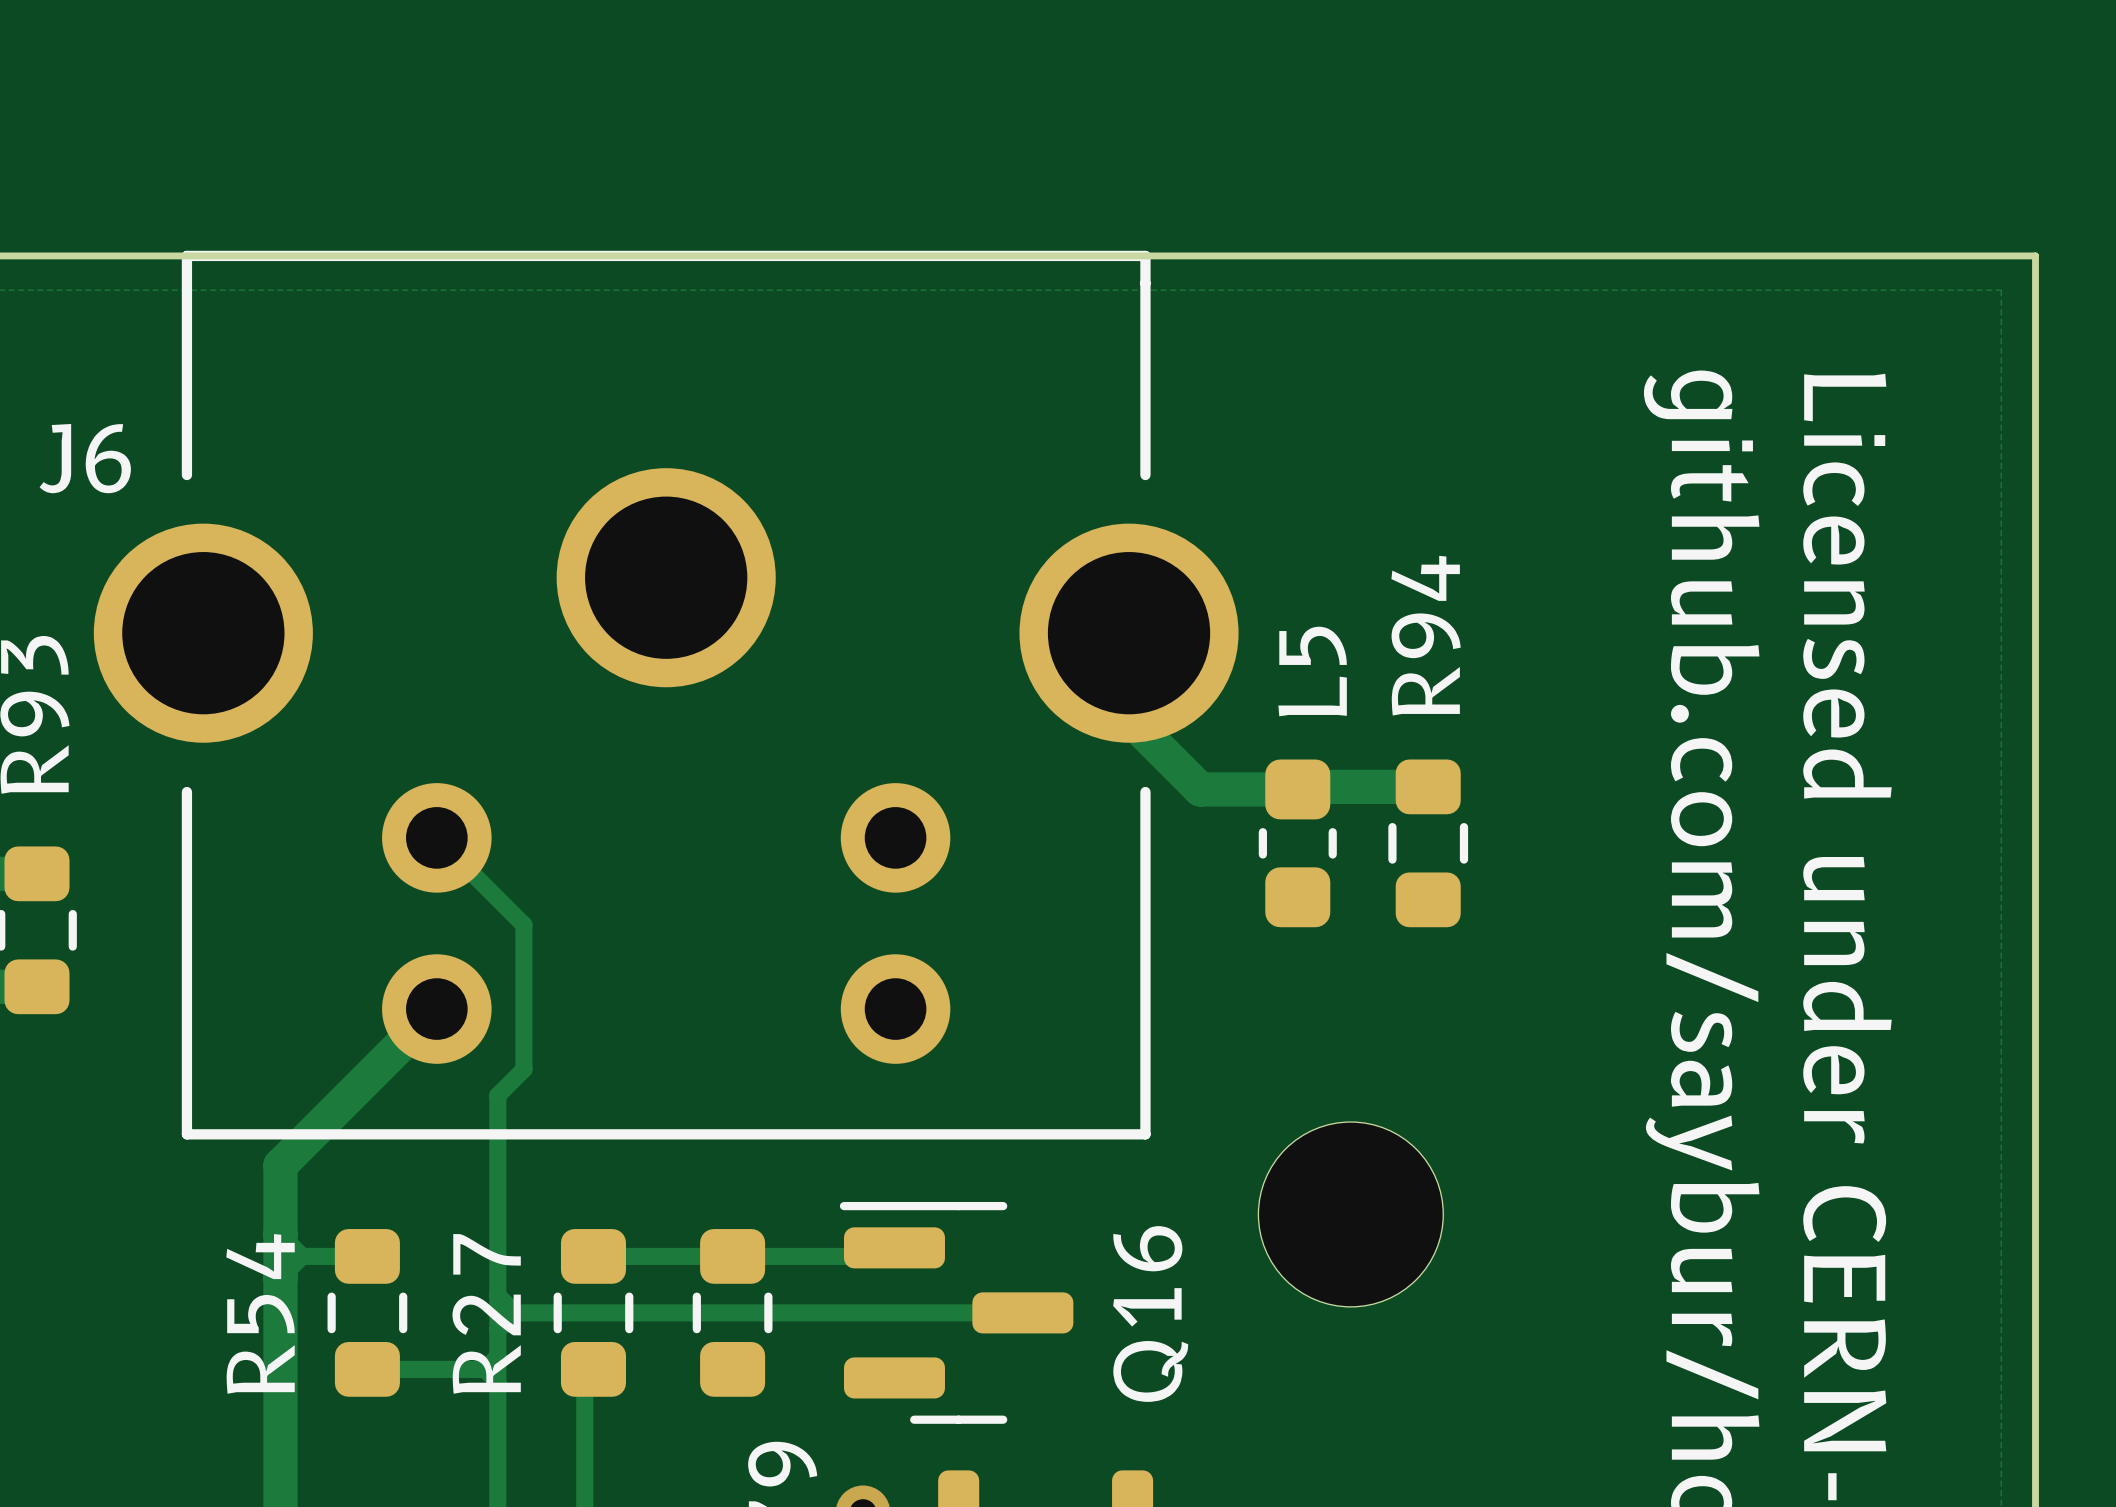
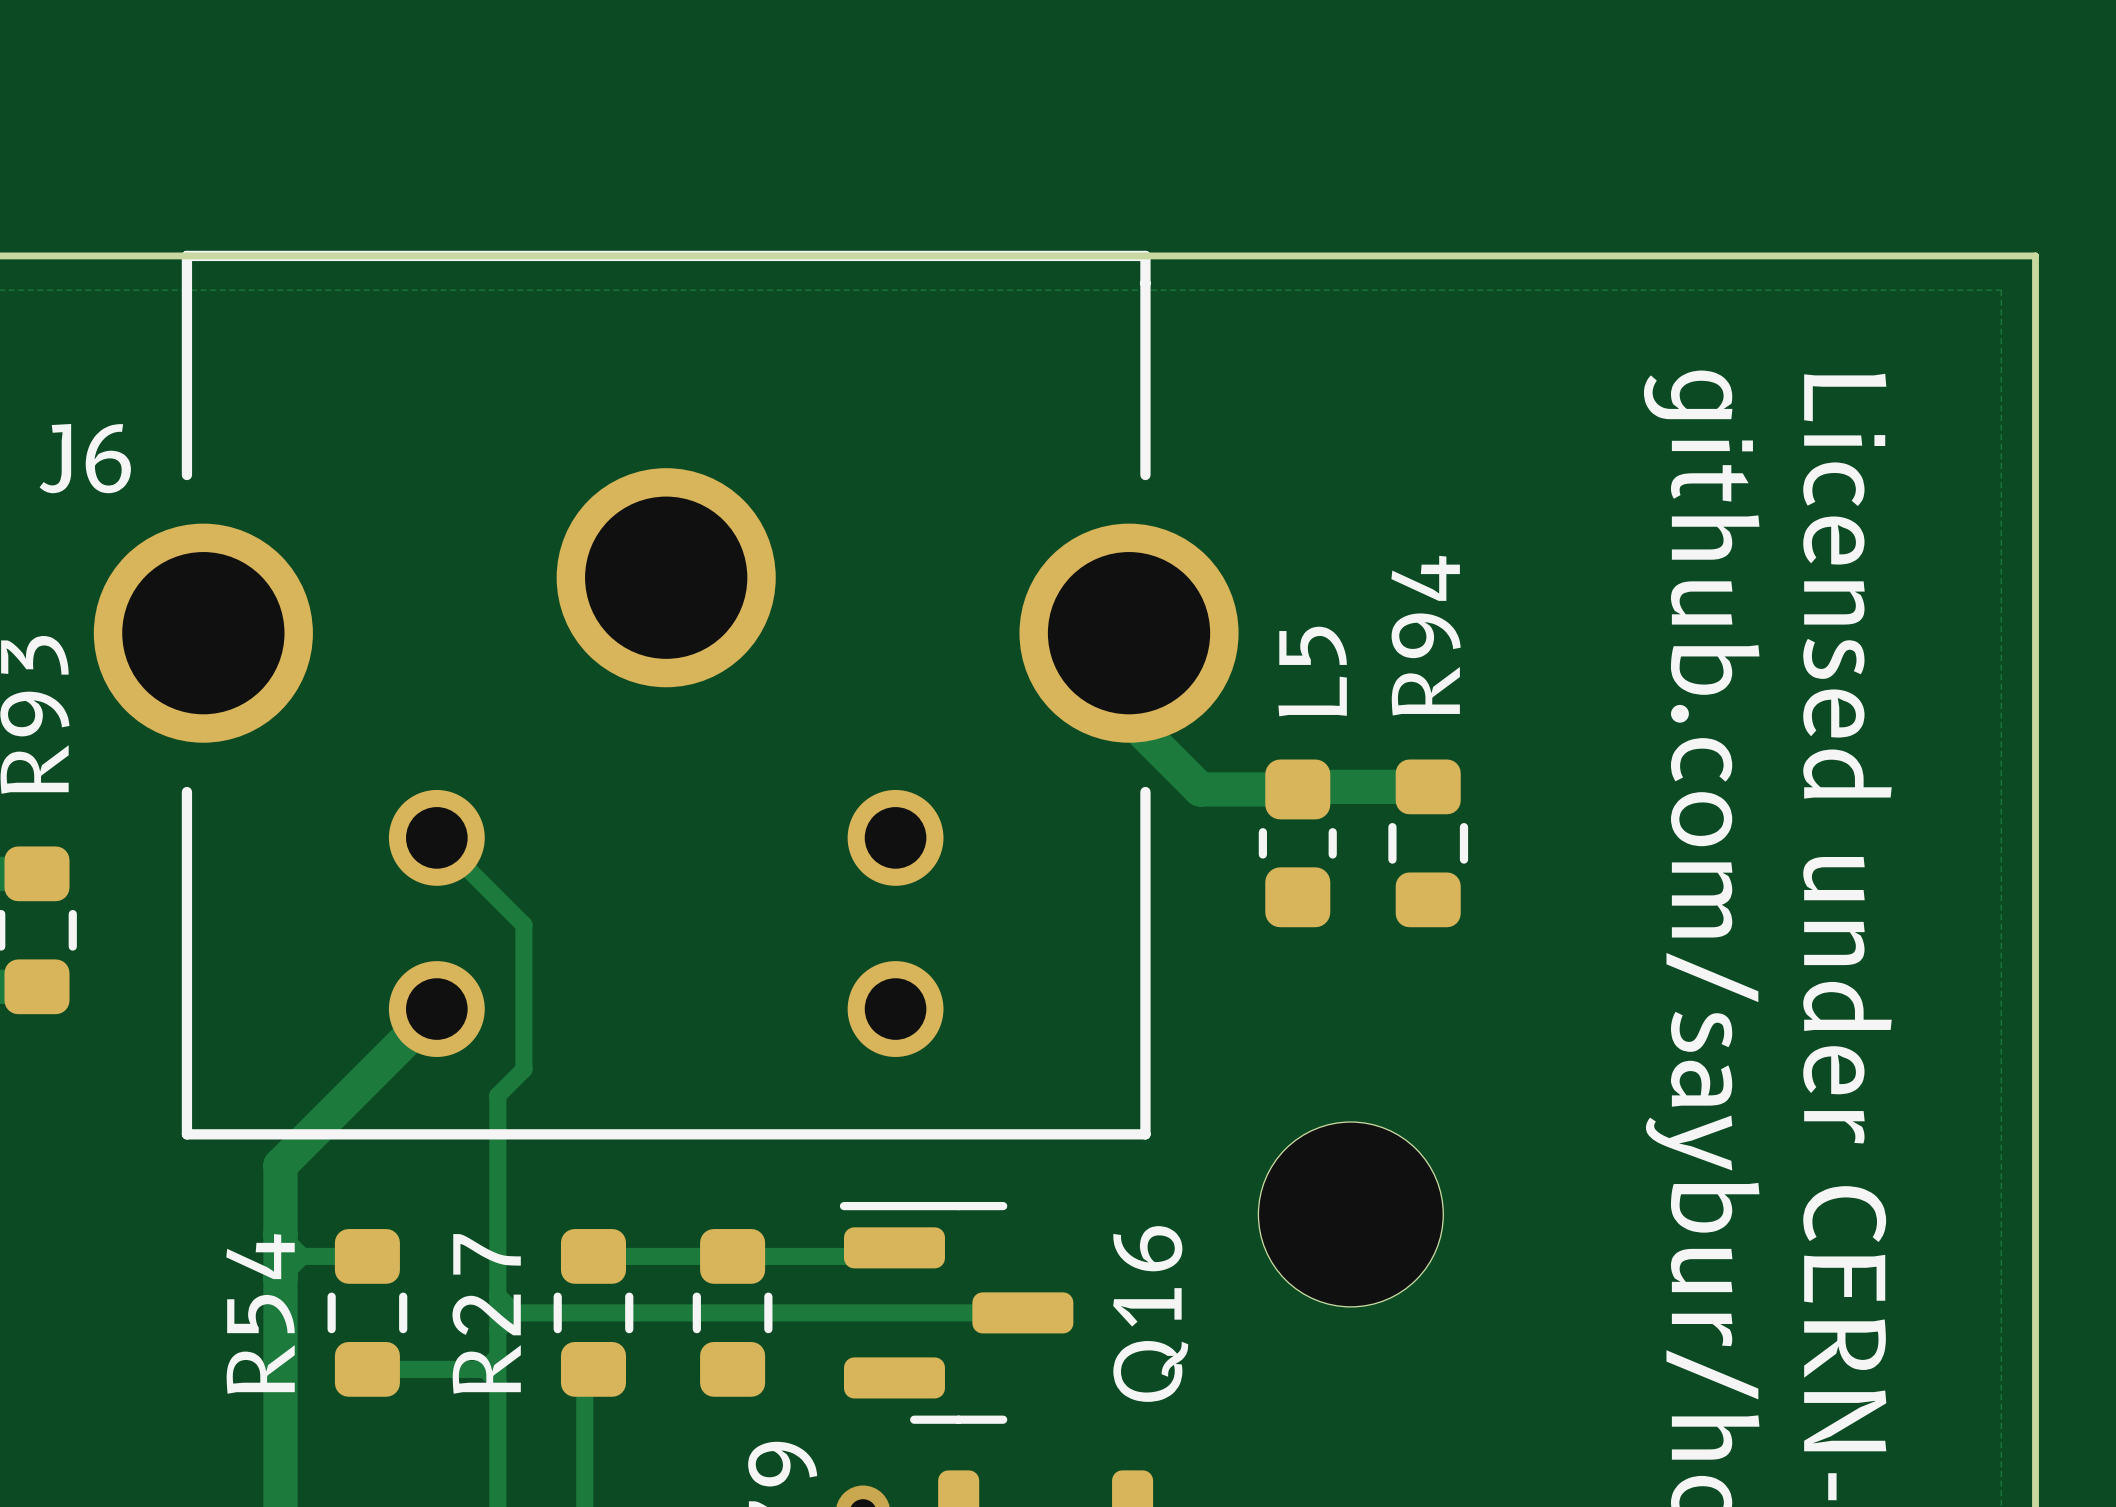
J6 footprint: [93, 250, 1239, 1140] -> [93, 250, 1239, 1140]

